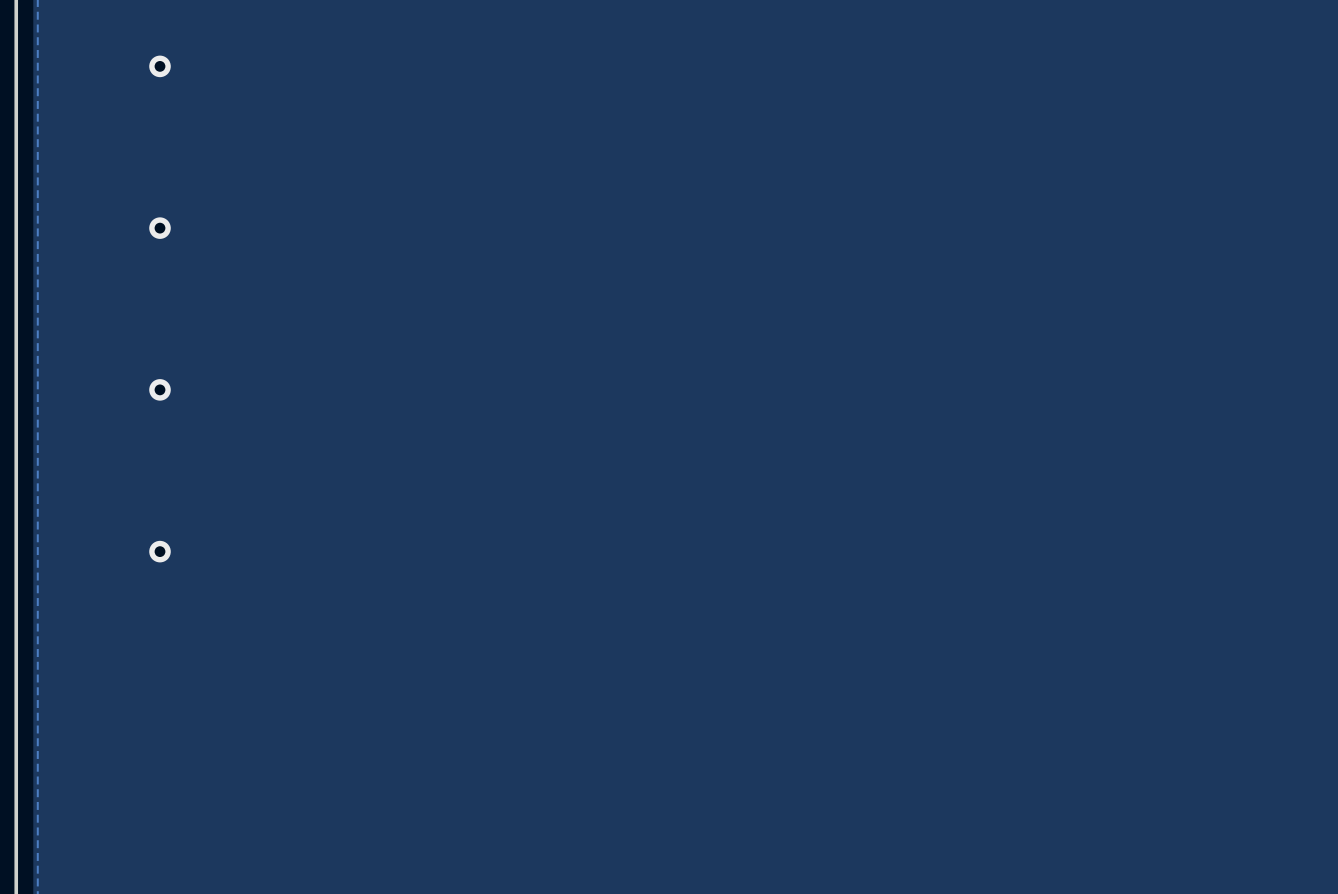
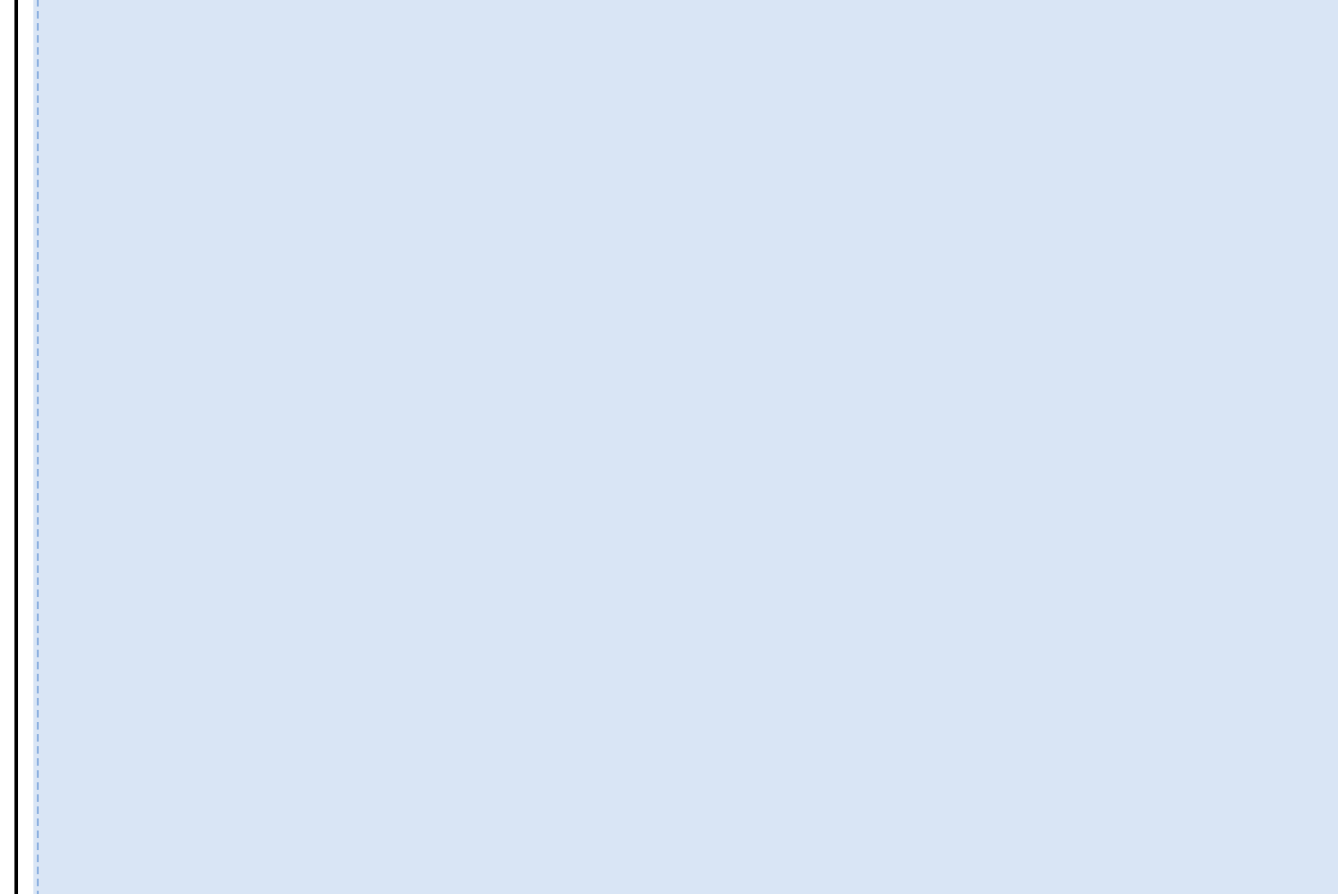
via: (160, 66) -> none
via: (160, 228) -> none
via: (160, 389) -> none
via: (160, 551) -> none

